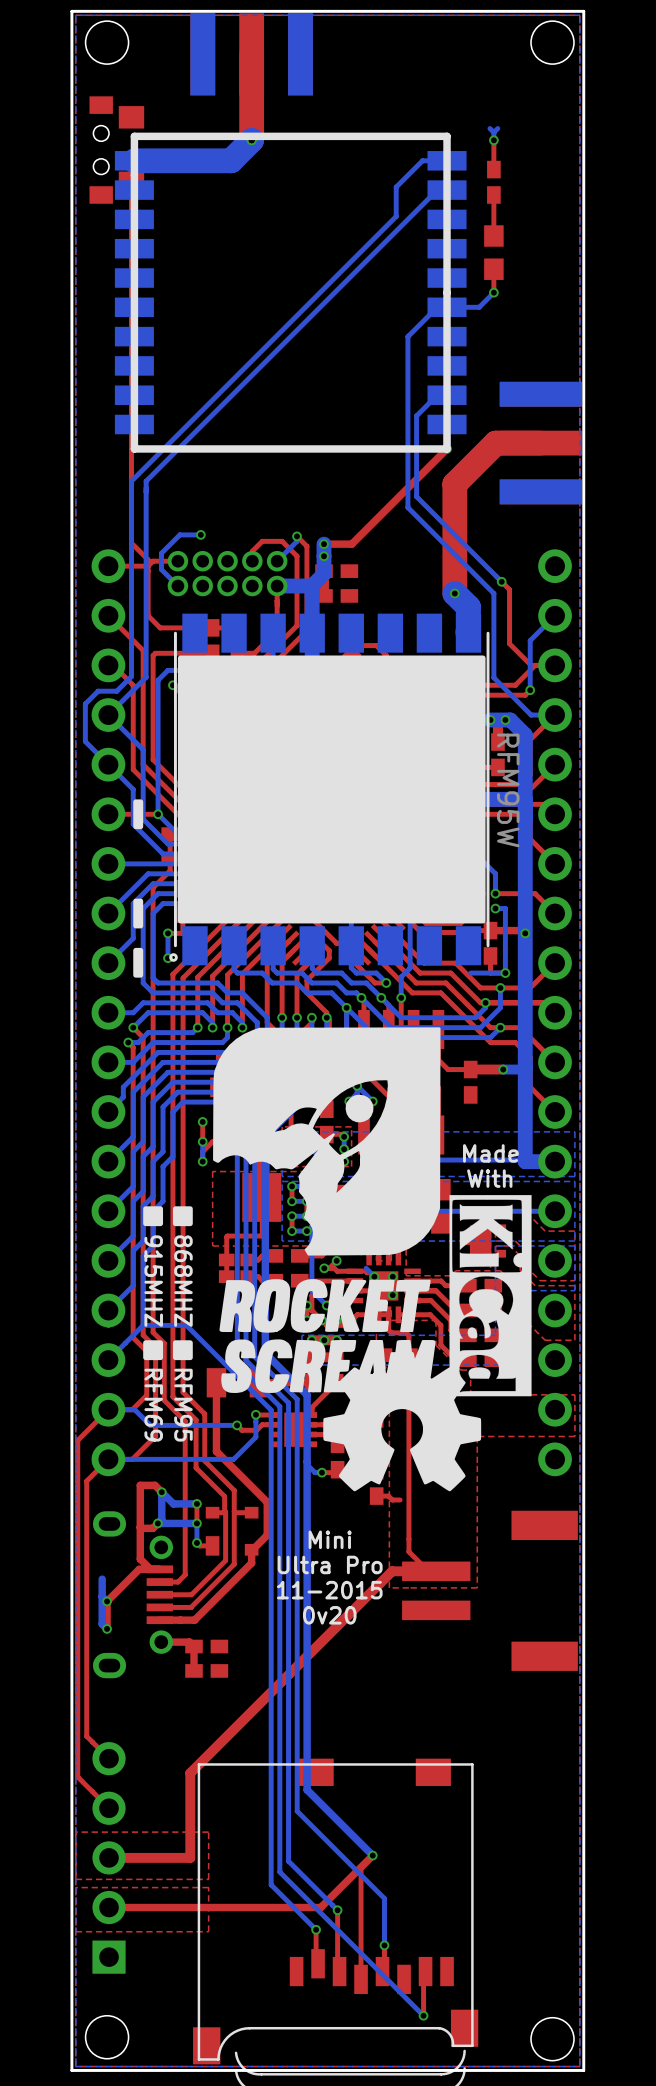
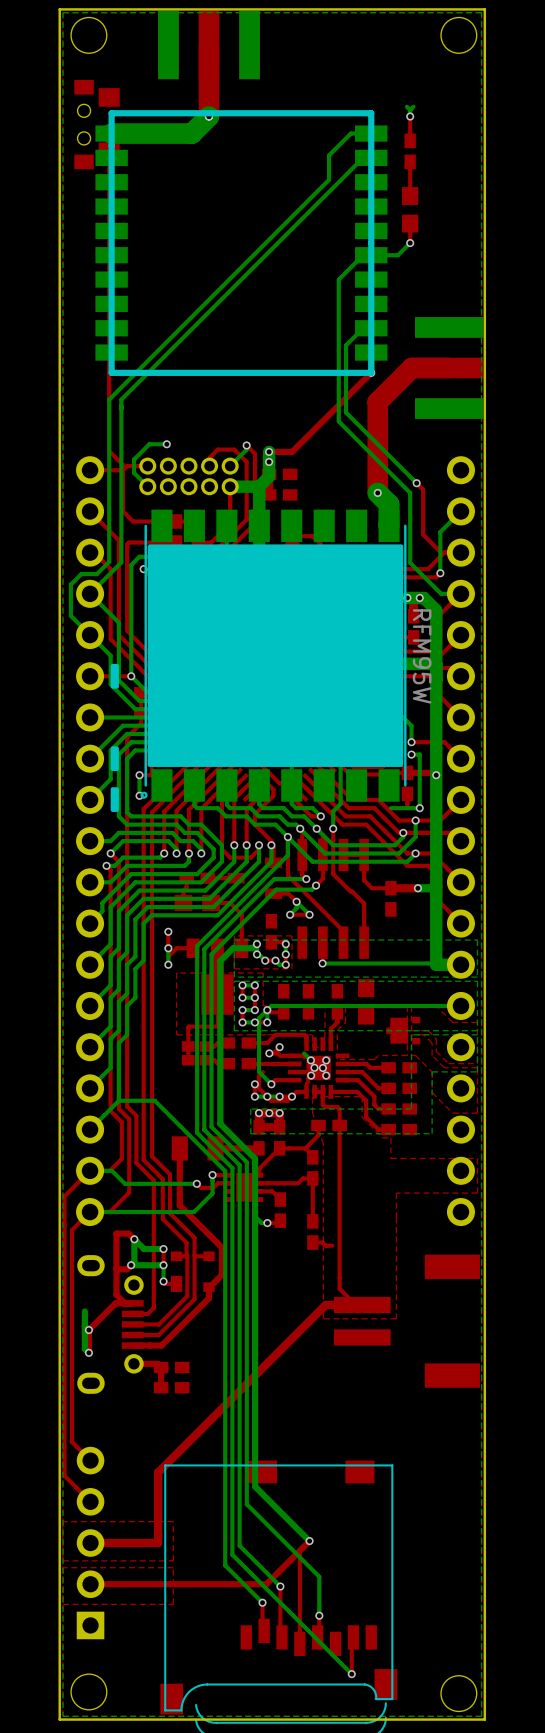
drawing: [143, 1027, 532, 1492] -> none
text: Made (490, 1153) -> none
text: With (489, 1178) -> none
text: 915MHZ (153, 1281) -> none
text: 868MHZ (183, 1281) -> none
text: RFM69 (153, 1405) -> none
text: RFM95 (183, 1405) -> none
text: Mini (330, 1539) -> none
text: Ultra Pro (330, 1564) -> none
text: 11-2015 (329, 1590) -> none
text: 0v20 (329, 1615) -> none

